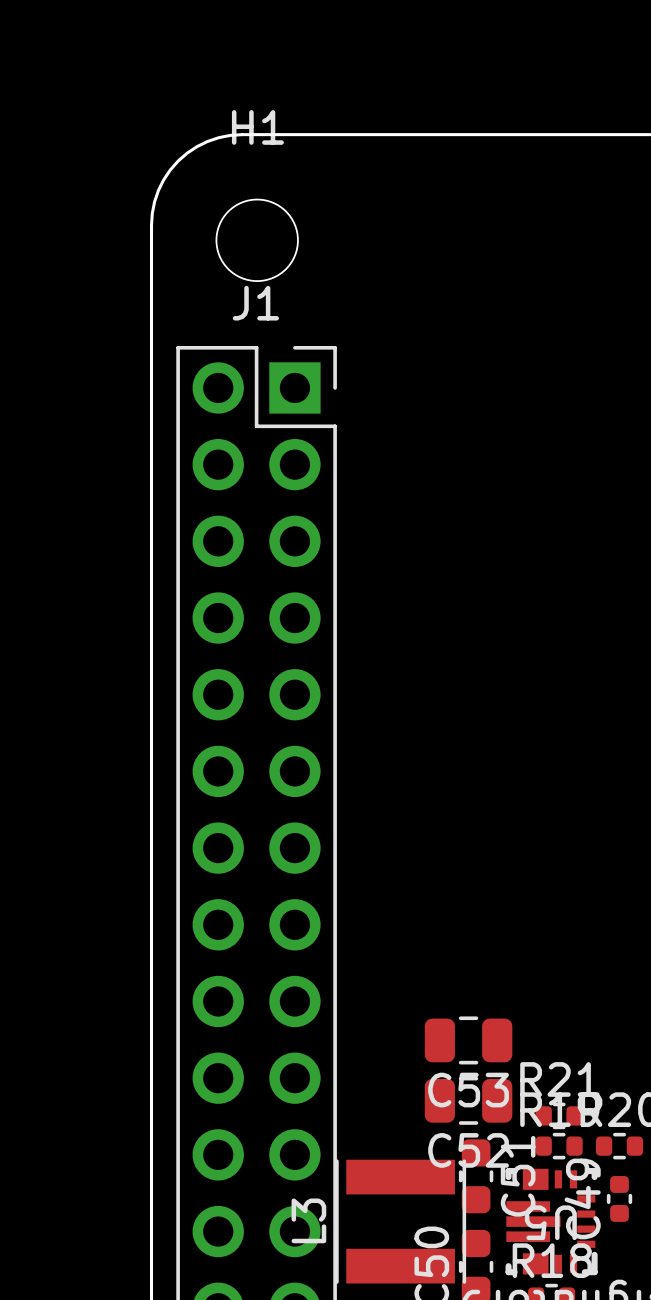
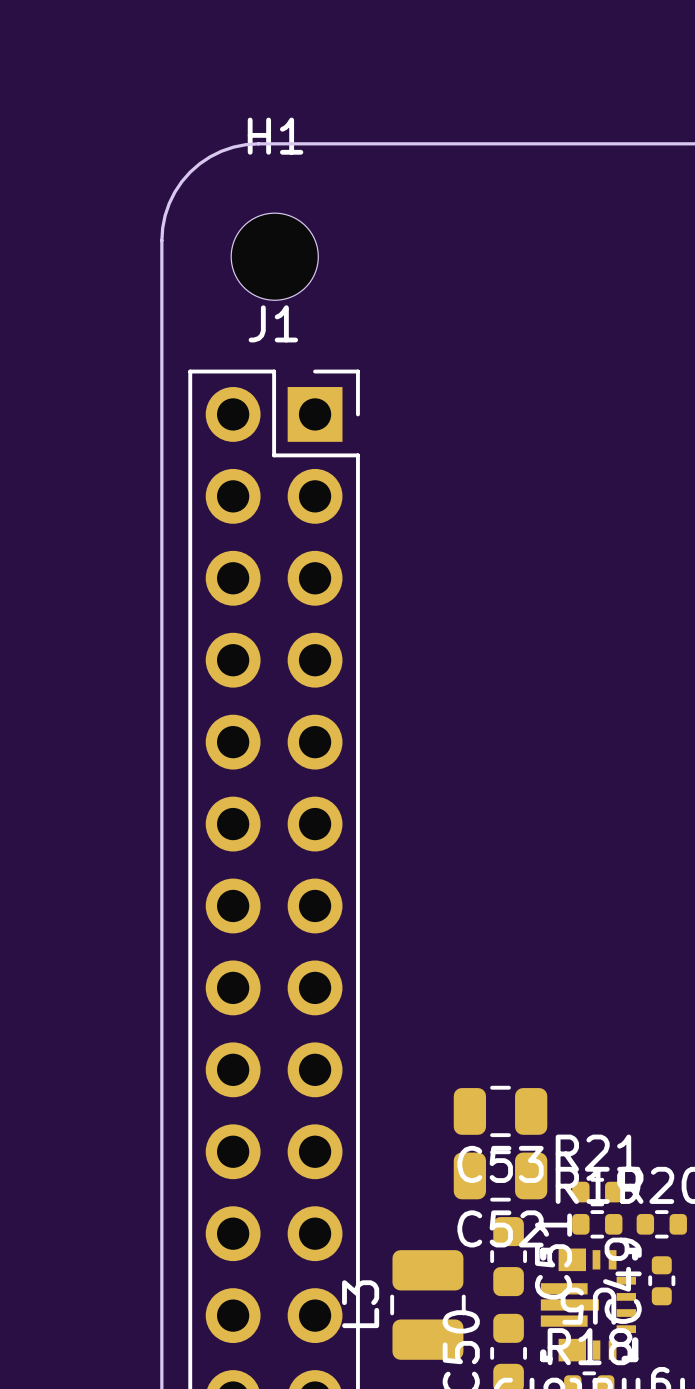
L3 footprint: [335, 1159, 467, 1284] -> [390, 1250, 466, 1360]

